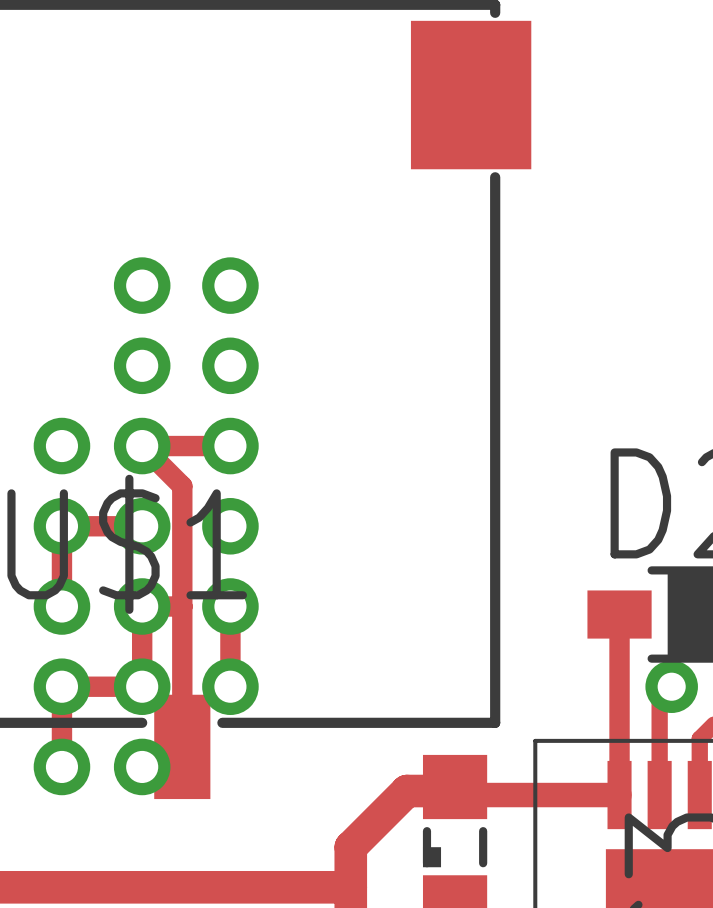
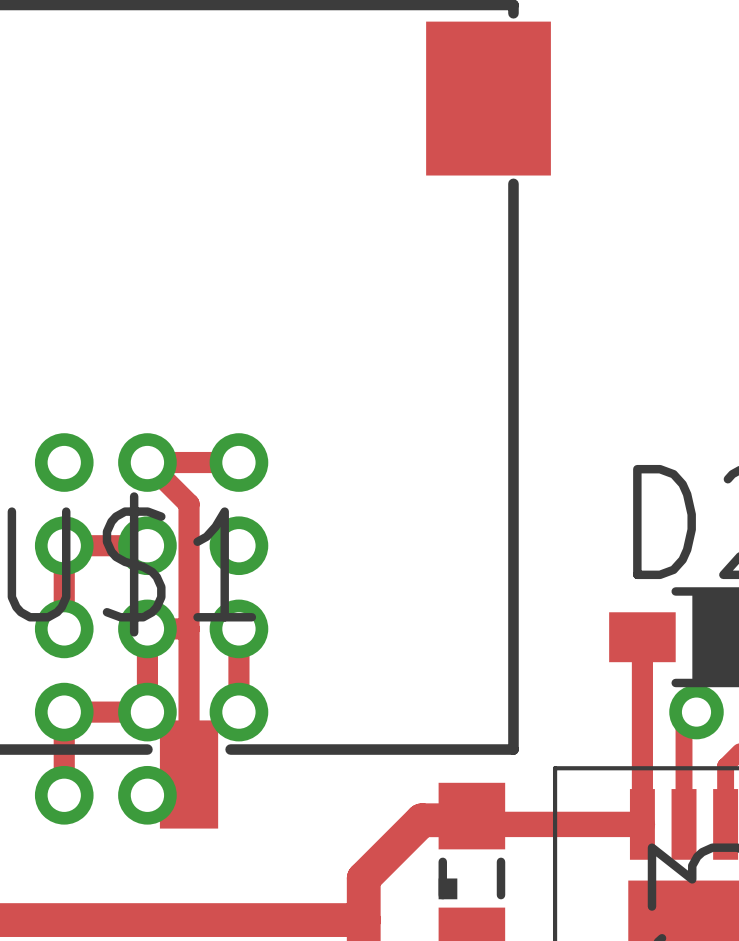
via: (142, 285) -> none
via: (230, 285) -> none
via: (142, 365) -> none
via: (230, 365) -> none

